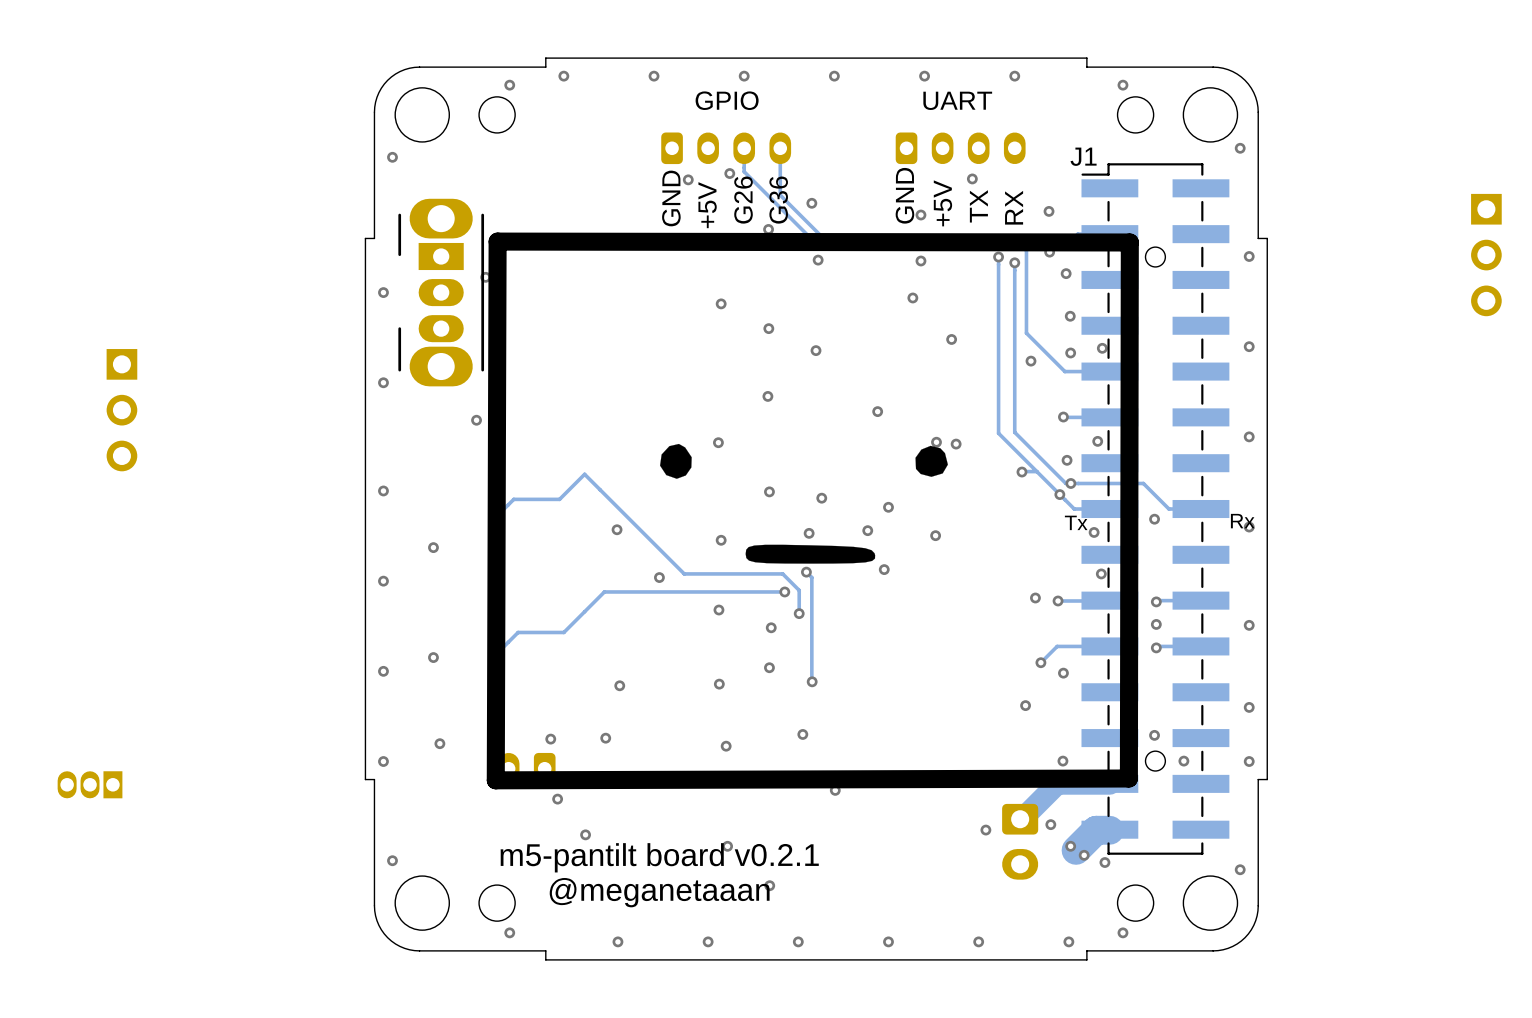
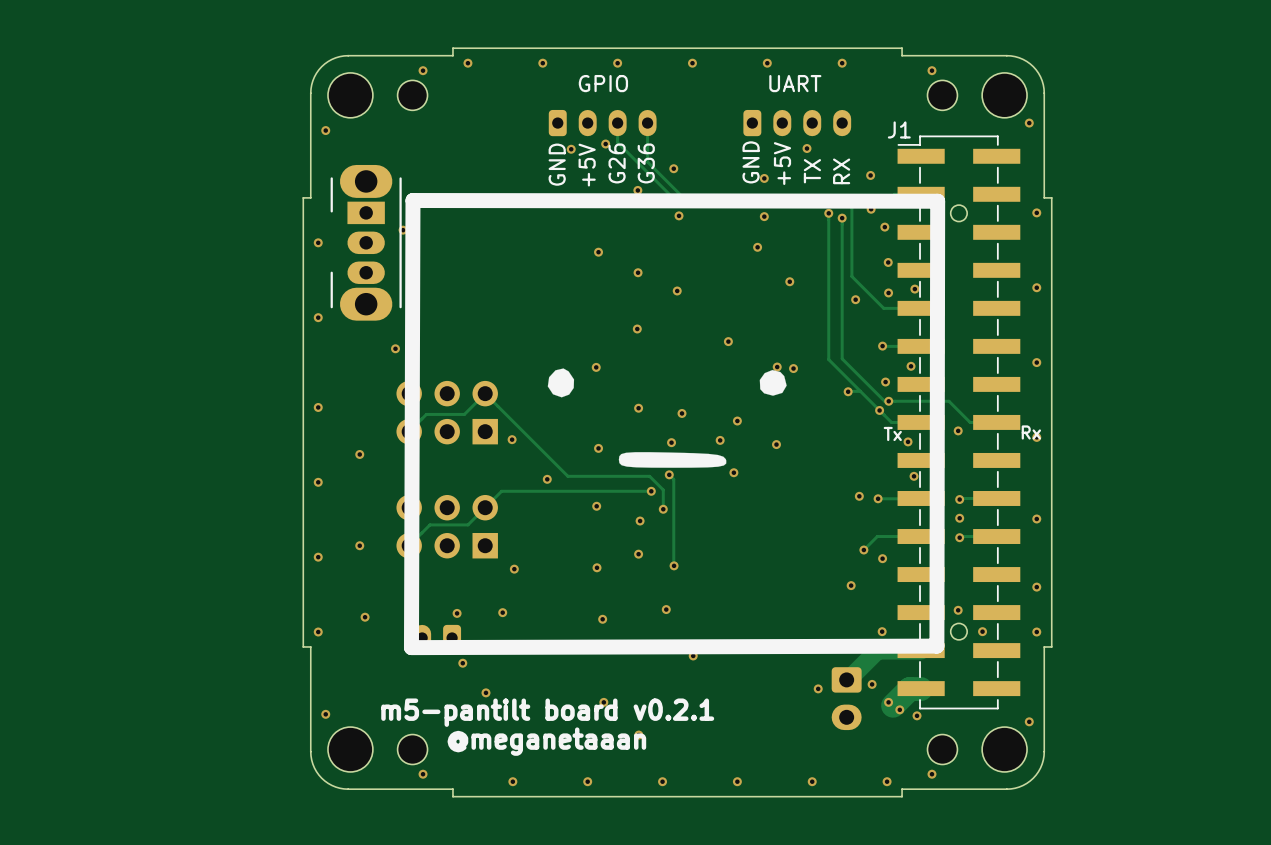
part: (1486, 255) -> none
part: (121, 410) -> none
part: none -> (447, 412)
part: none -> (447, 526)
part: (90, 784) -> none

